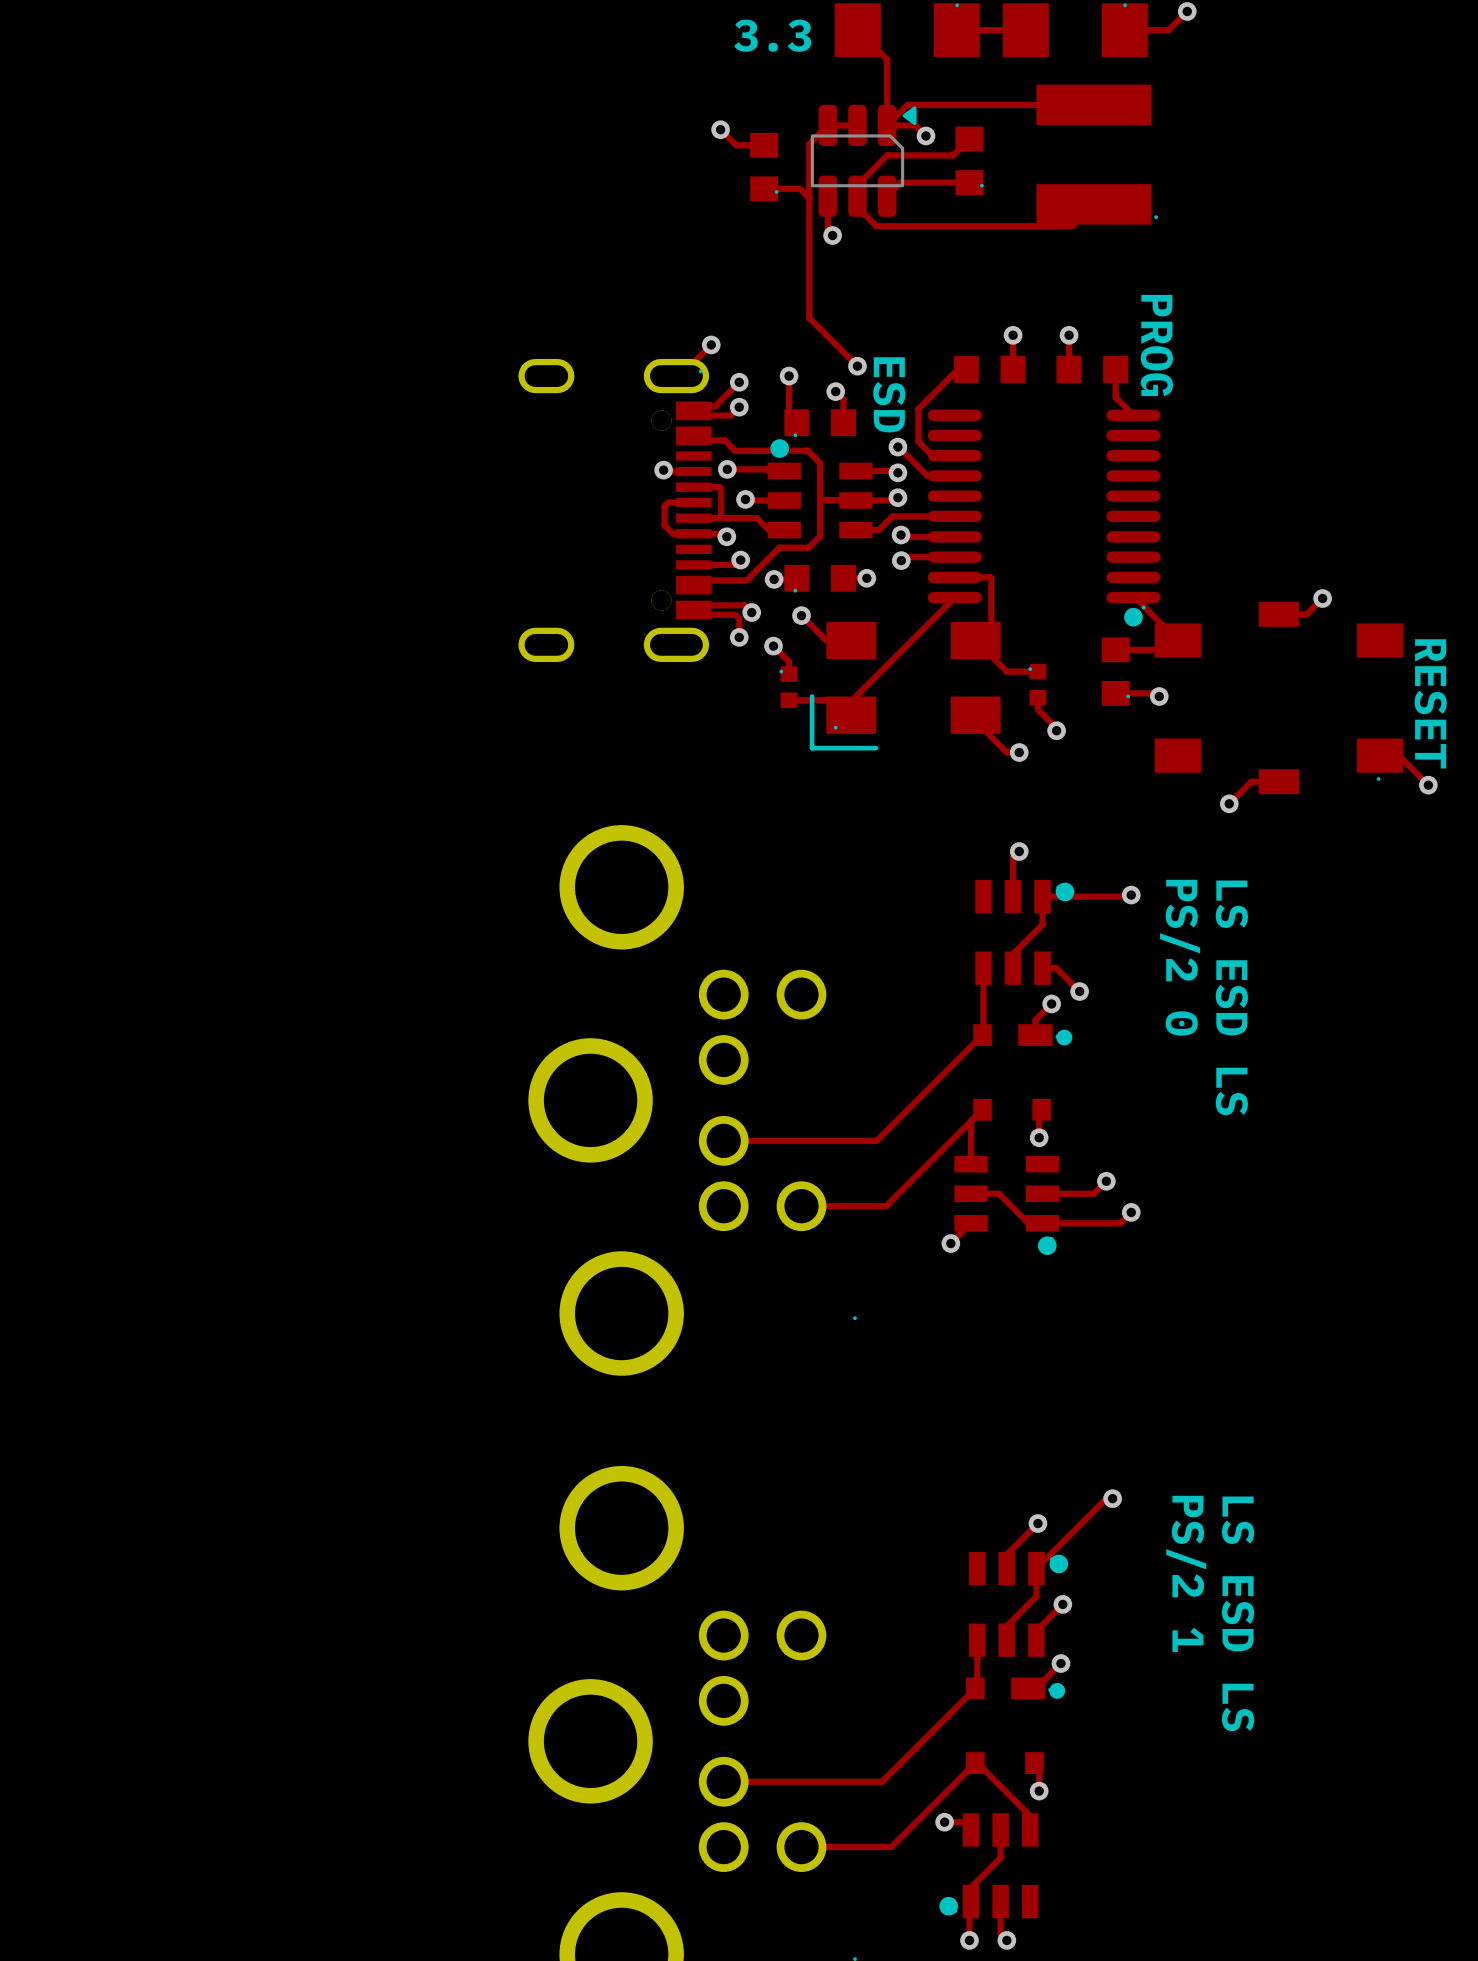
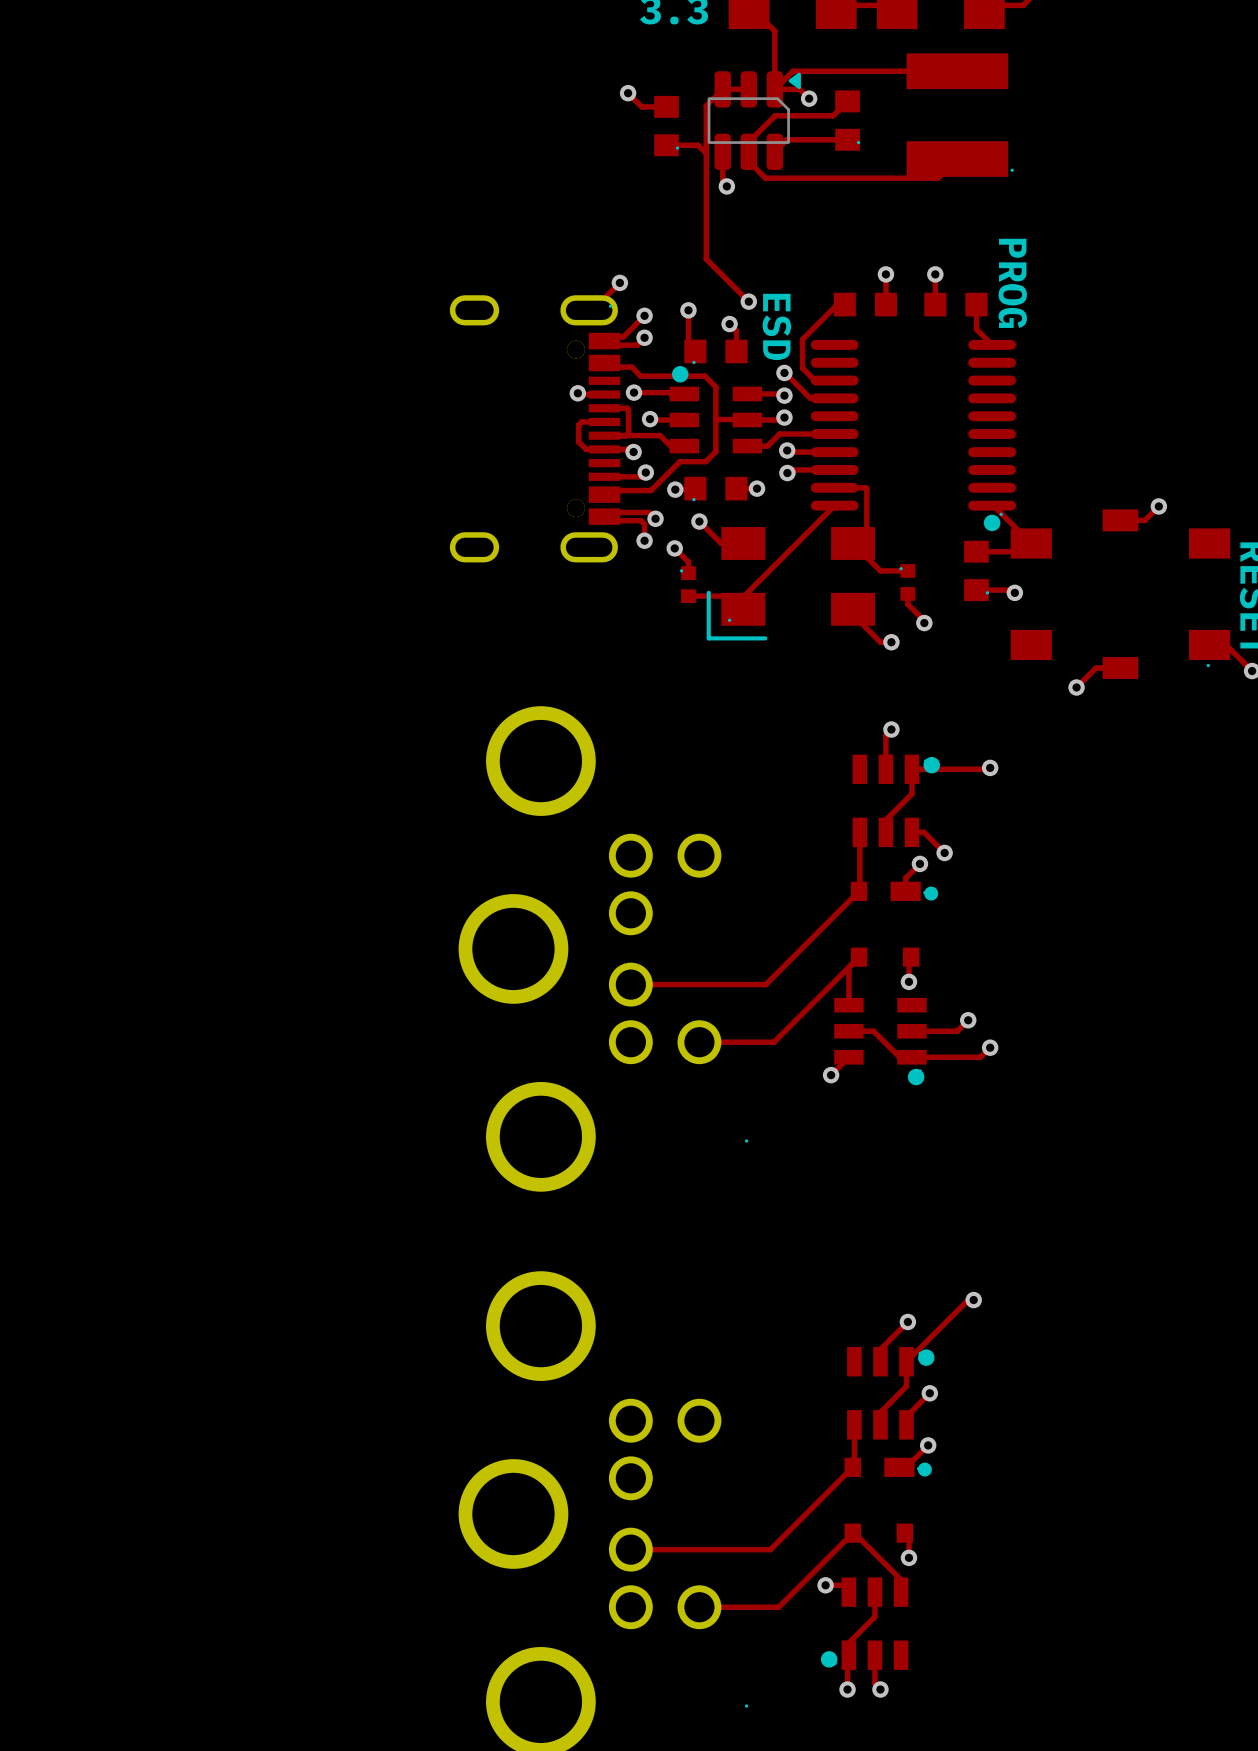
text: PS/2 0 (1180, 957) -> none
text: LS ESD LS (1231, 997) -> none
text: PS/2 1 (1186, 1573) -> none
text: LS ESD LS (1238, 1613) -> none

